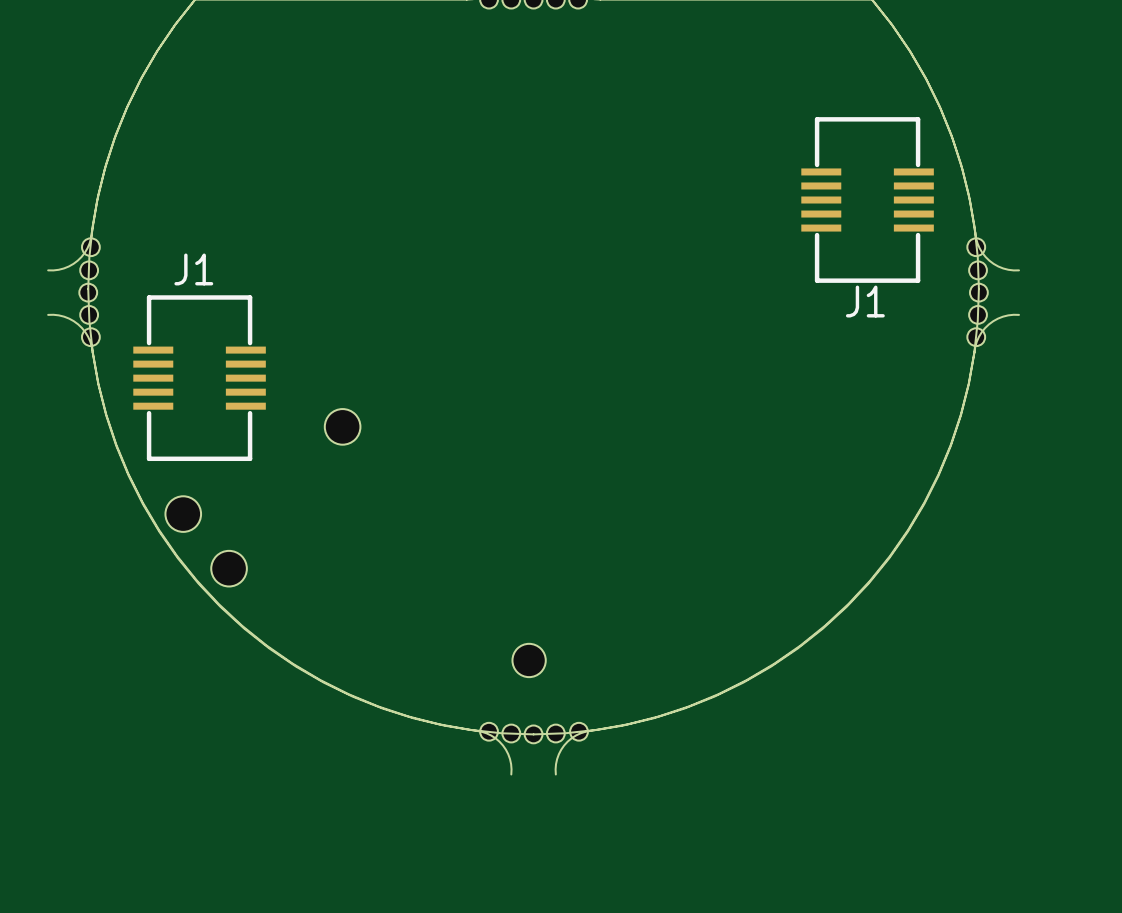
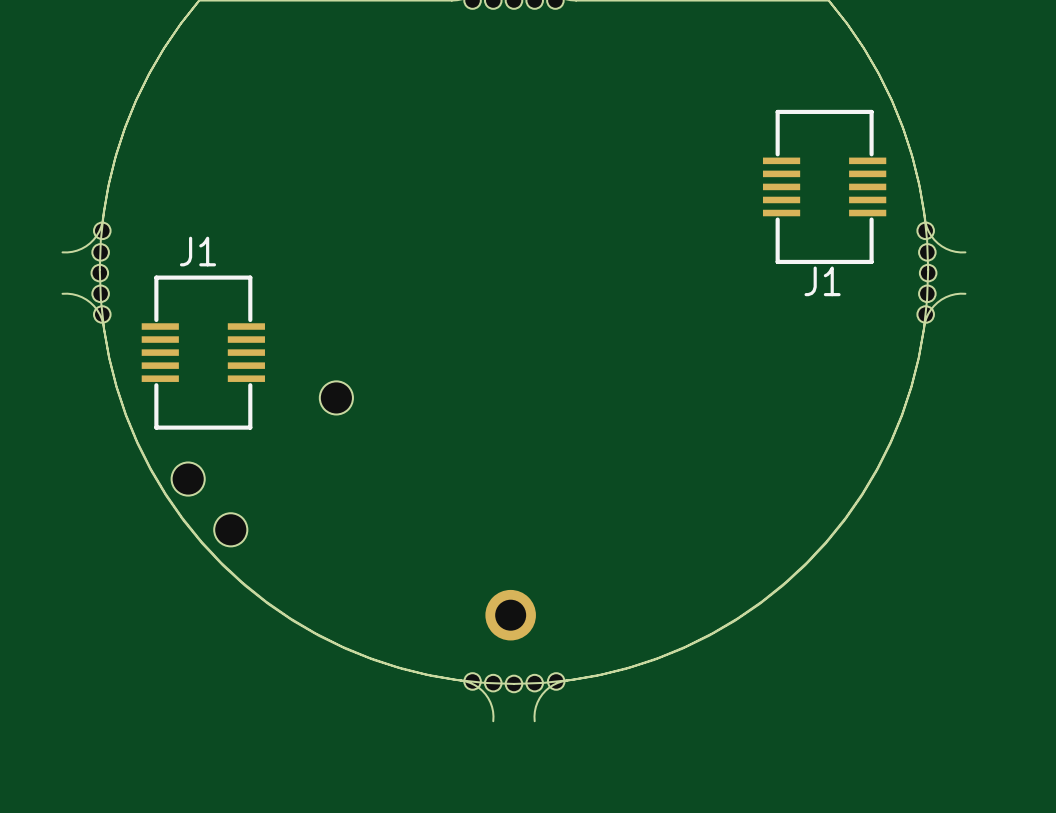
part footprint: [512, 643, 546, 678] -> [485, 589, 536, 641]

